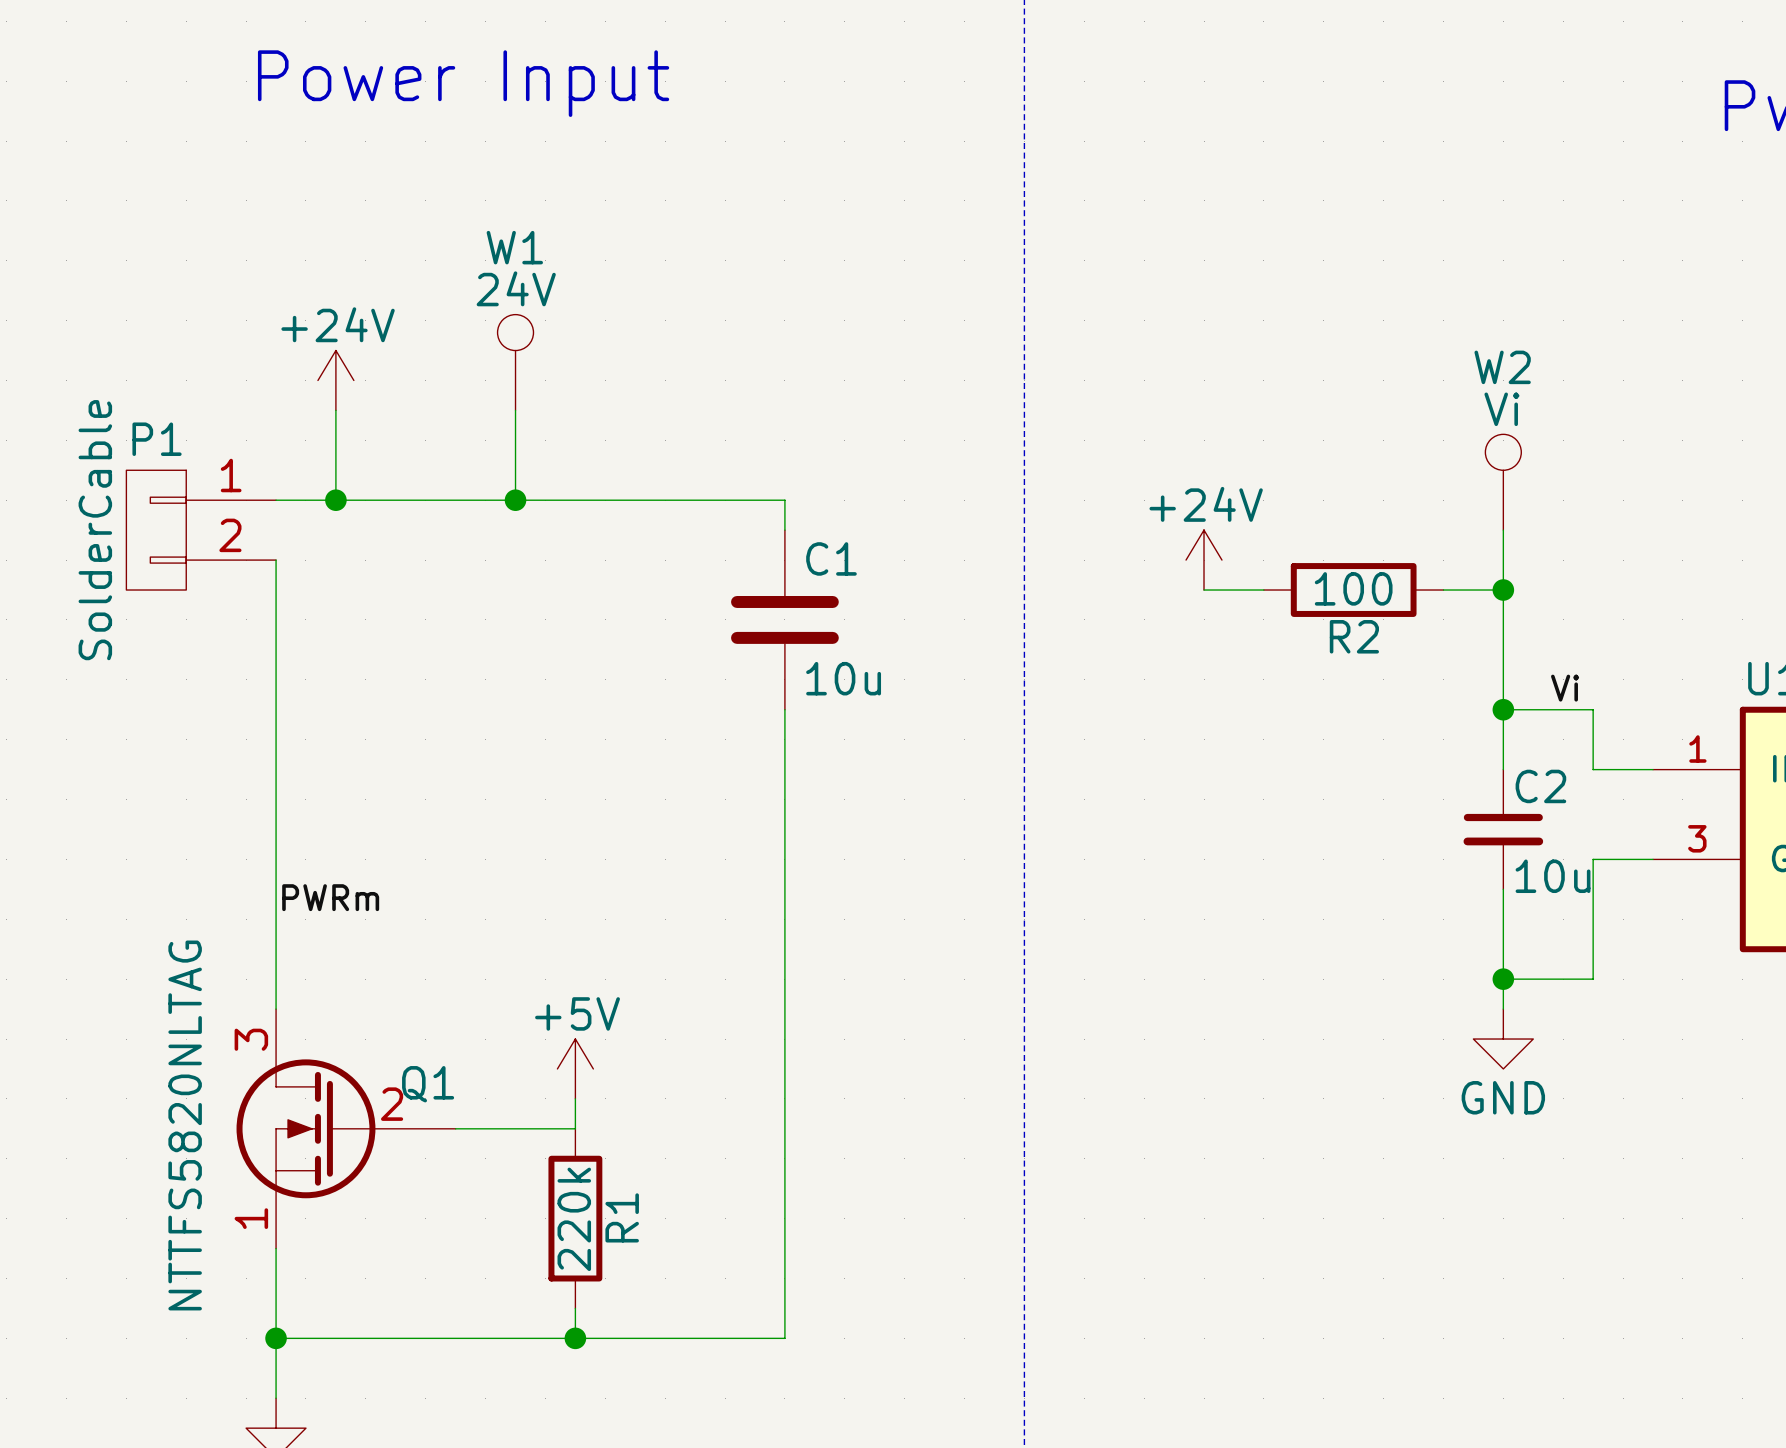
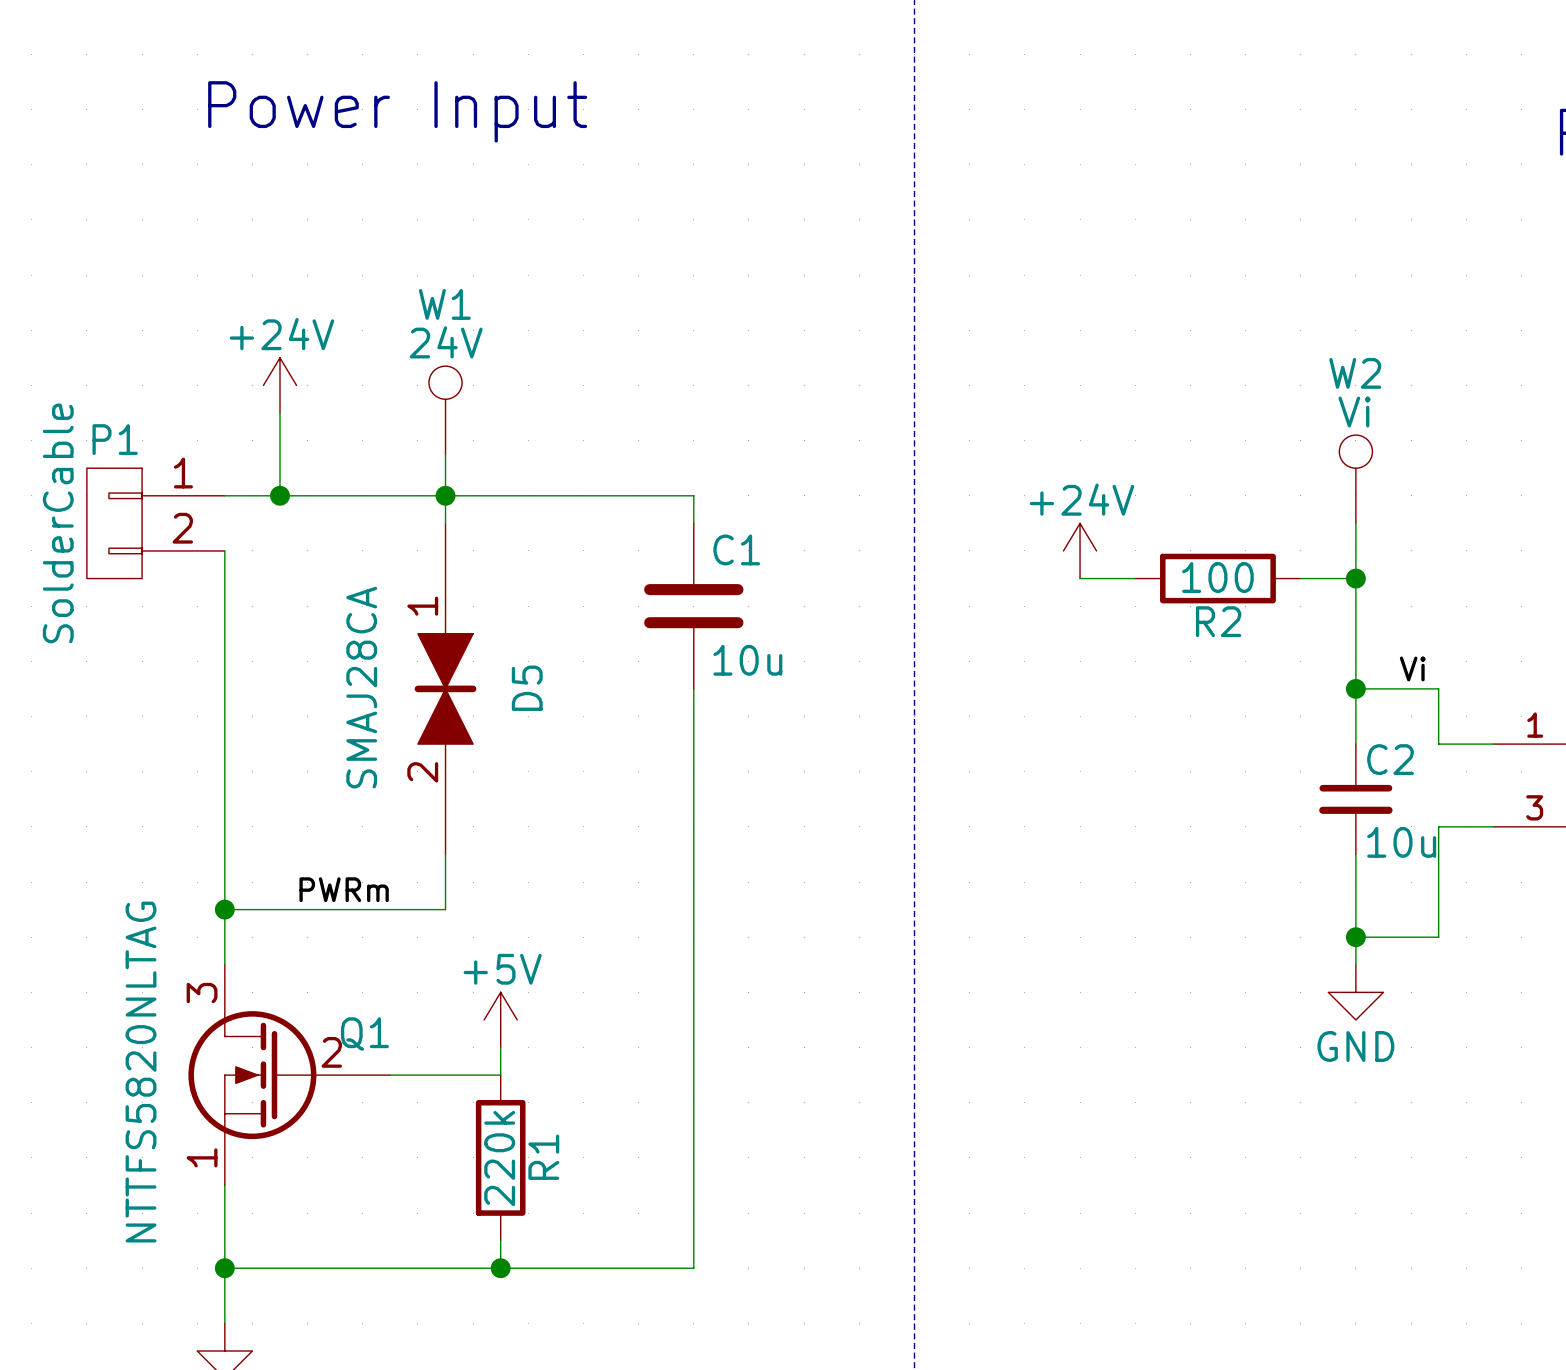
W1 position: (515, 362) -> (445, 410)
wire: none -> (445, 495) (445, 523)
D5: none -> SMAJ28CA (445, 688)
wire: none -> (445, 854) (445, 909) (224, 909)
label position: PWRm (330, 897) -> PWRm (344, 889)
junction: none -> (224, 909)

